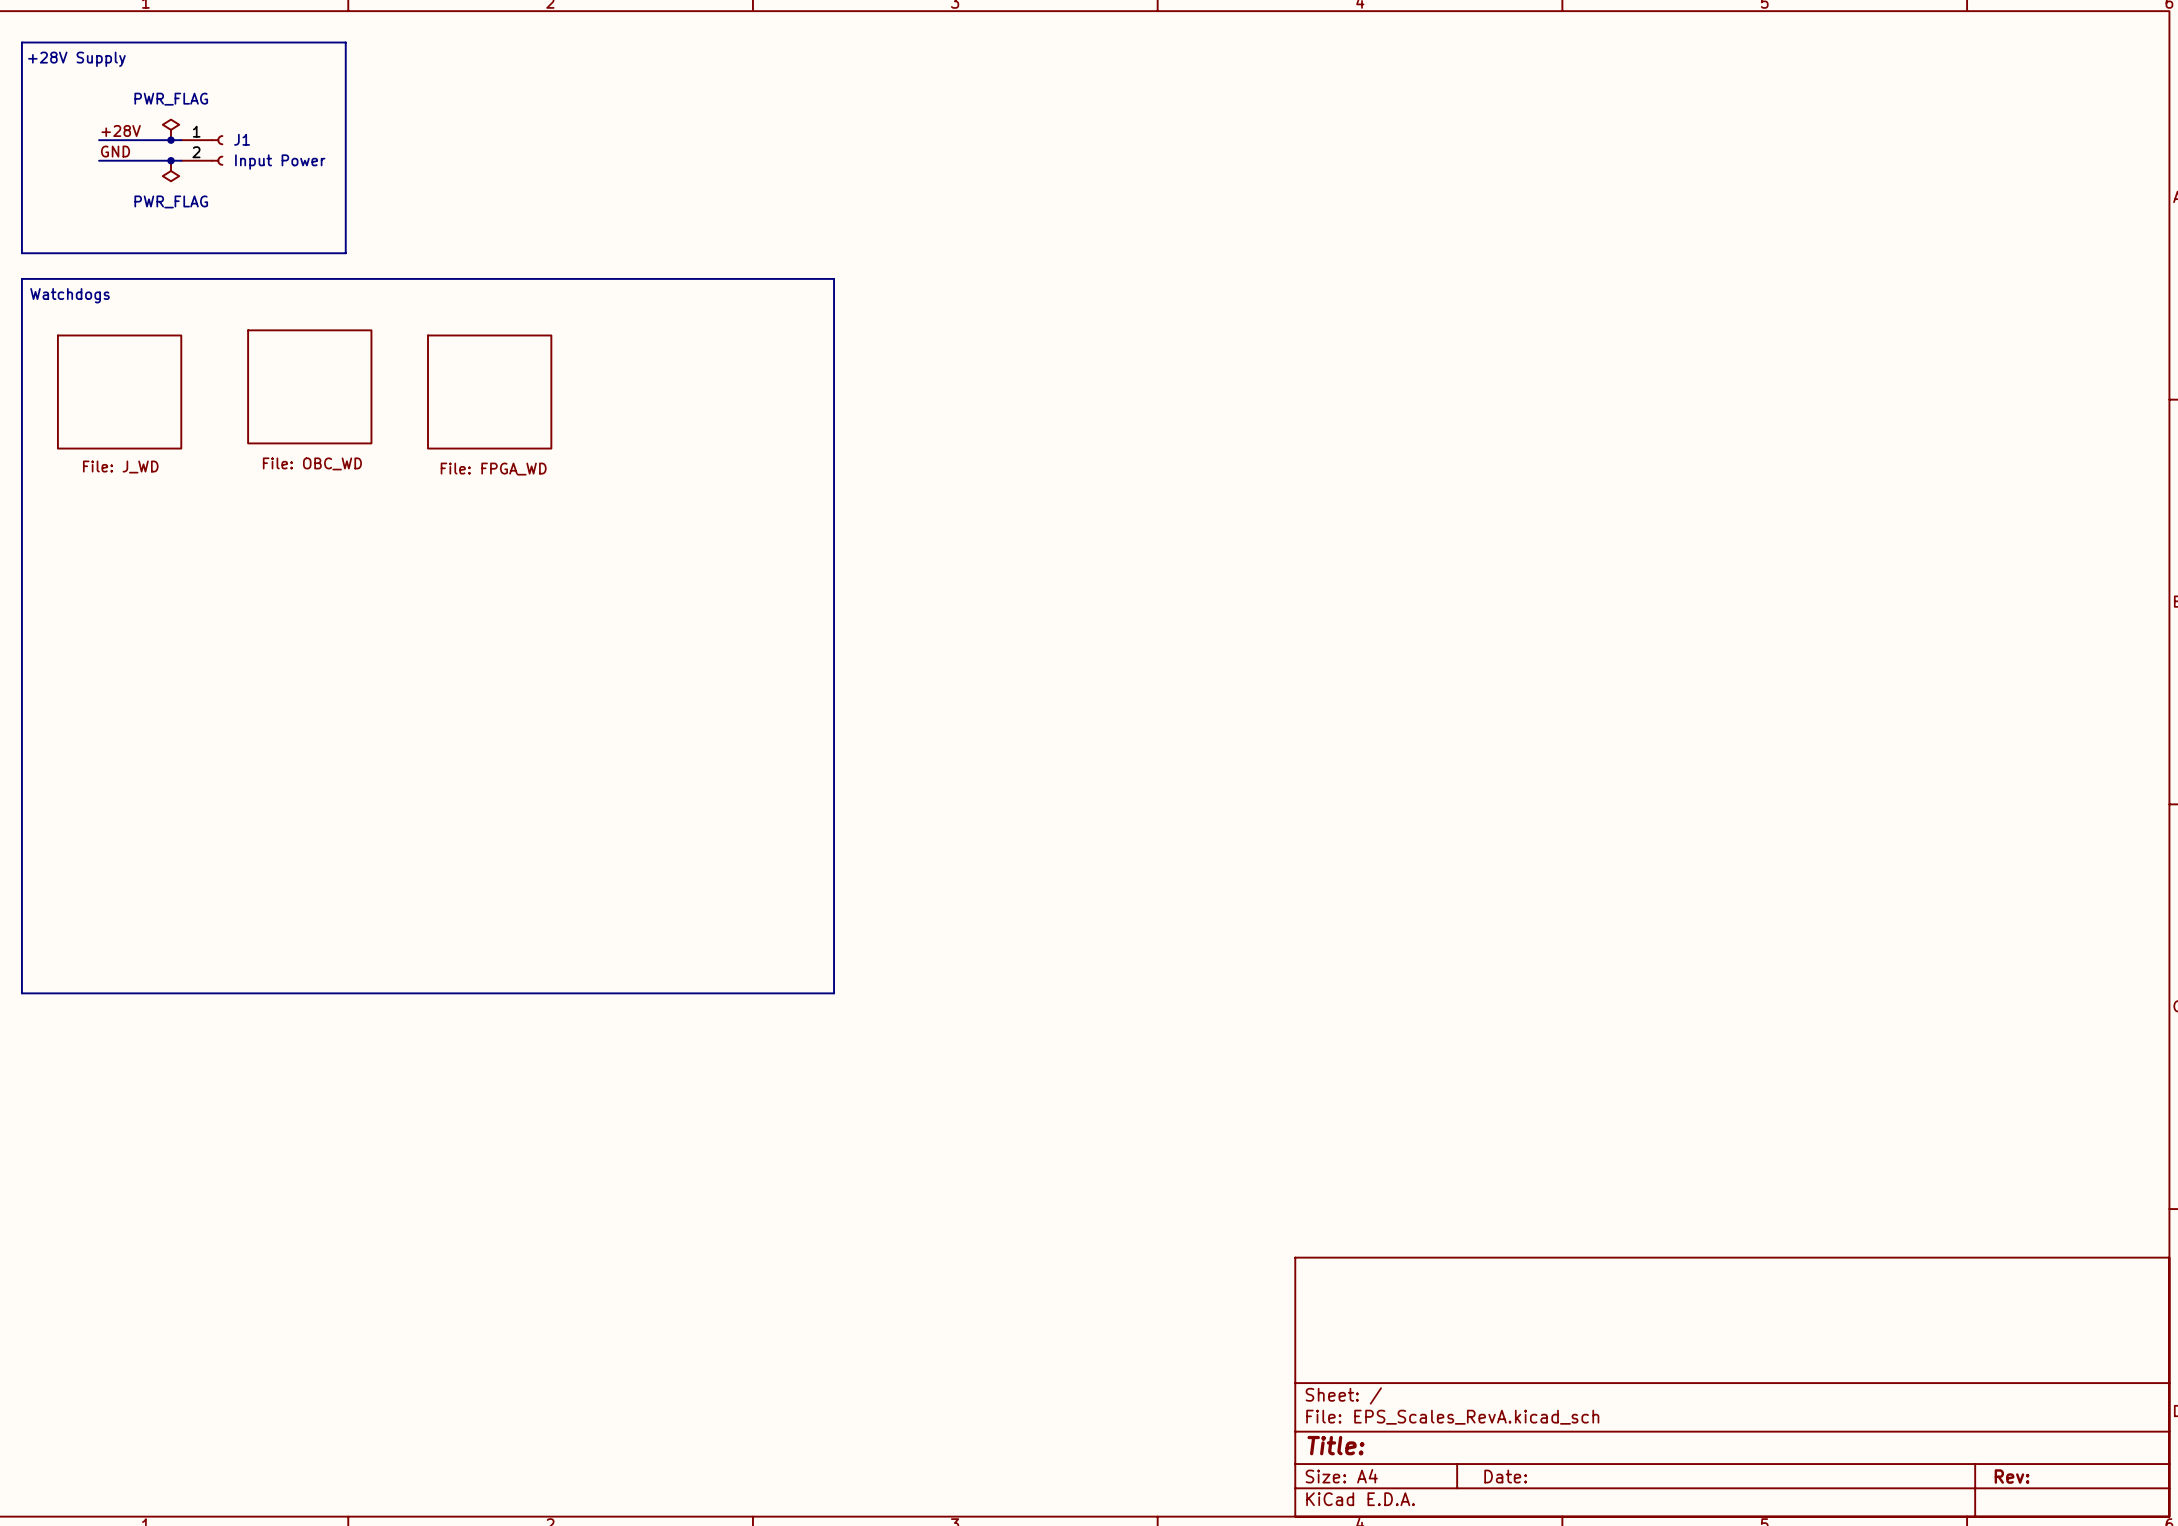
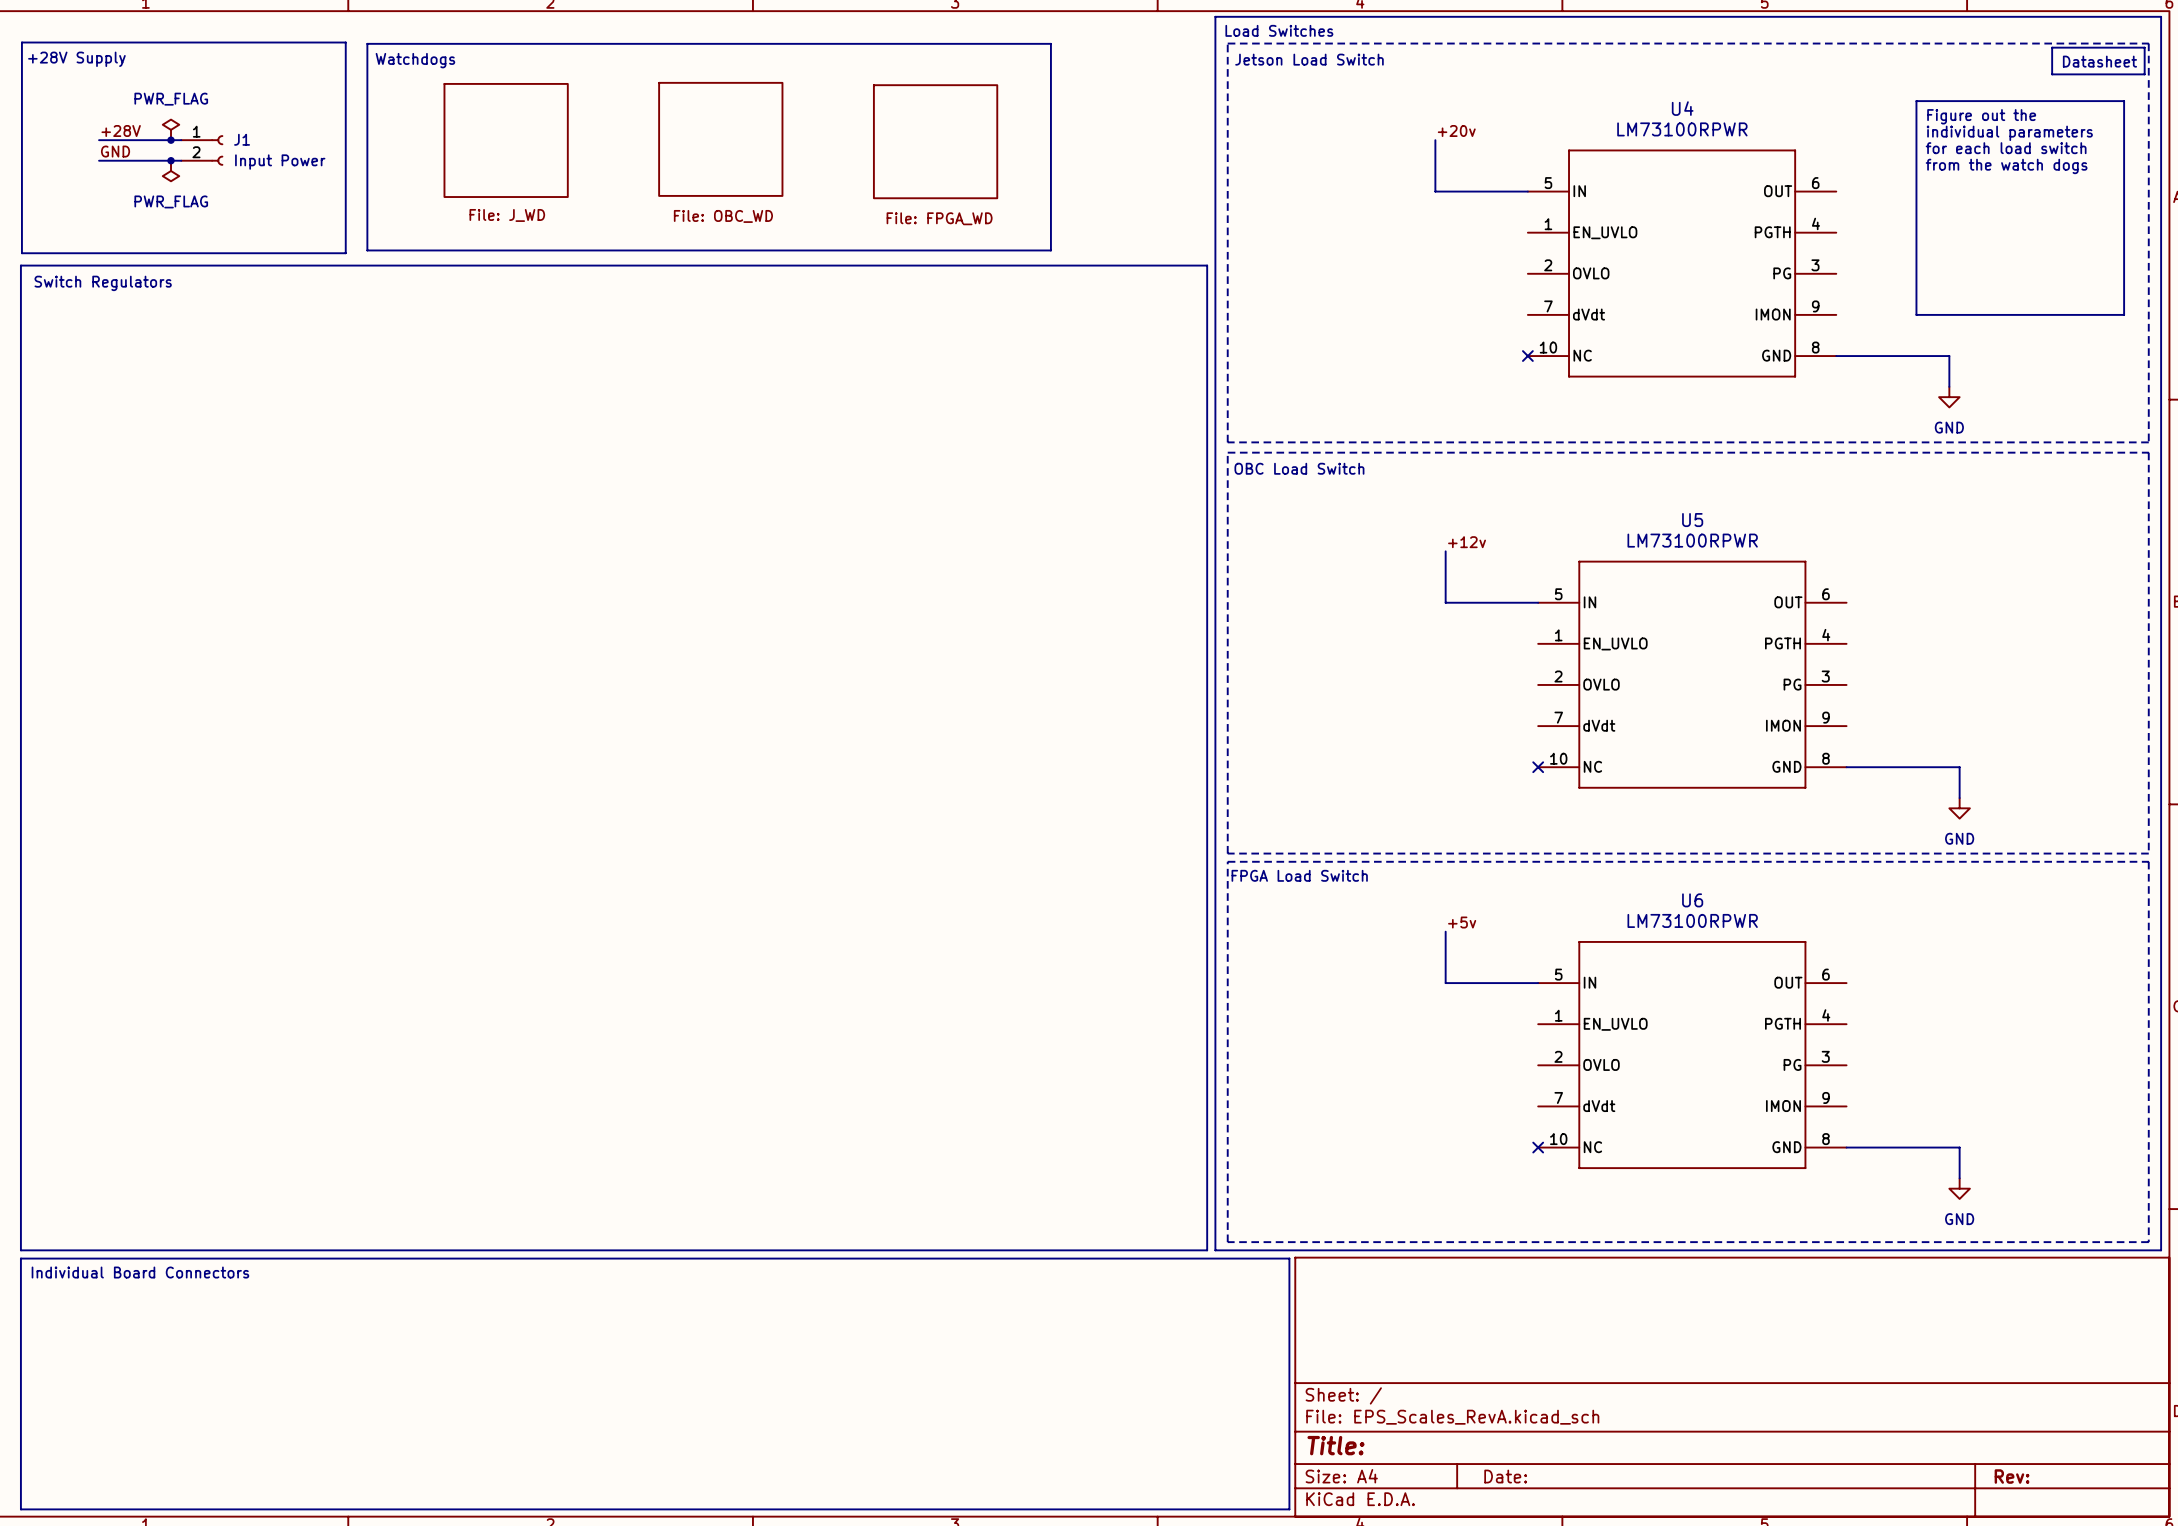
line: none -> (1215, 16) (2161, 16) (2161, 1250) (1215, 1250) (1215, 16)
text: none -> Load Switches (1279, 30)
line: none -> (367, 43) (1050, 43) (1050, 250) (367, 250) (367, 43)
line: none -> (1227, 43) (1227, 442) (2148, 442) (2148, 43) (1227, 43)
line: none -> (2052, 47) (2144, 47) (2144, 74) (2052, 74) (2052, 47)
text: none -> Jetson Load Switch (1309, 59)
text: none -> Watchdogs (415, 60)
text: none -> Datasheet (2099, 61)
line: none -> (1916, 101) (2124, 101) (2124, 314) (1916, 314) (1916, 101)
text: none -> Figure out the (1981, 116)
label: none -> +20v (1456, 130)
text: none -> individual parameters (2009, 133)
sheet: none -> File: OBC_WD (720, 139)
sheet: none -> File: J_WD (506, 140)
wire: none -> (1435, 140) (1435, 191) (1527, 191)
sheet: none -> File: FPGA_WD (935, 141)
text: none -> for each load switch (2006, 148)
text: none -> from the watch dogs (2006, 166)
U4: none -> LM73100RPWR (1682, 263)
line: none -> (20, 265) (1207, 265) (1207, 1250) (20, 1250) (20, 265)
line: (21, 278) (21, 993) (834, 993) (834, 278) (21, 278) -> none
text: none -> Switch Regulators (103, 283)
text: Watchdogs (70, 295) -> none
no-connect mark: none -> (1527, 356)
wire: none -> (1836, 356) (1949, 356) (1949, 386)
sheet: File: OBC_WD (309, 386) -> none
sheet: File: J_WD (119, 392) -> none
sheet: File: FPGA_WD (489, 392) -> none
power symbol: none -> GND (1949, 397)
line: none -> (1227, 452) (2148, 452) (2148, 853) (1227, 853) (1227, 452)
text: none -> OBC Load Switch (1299, 468)
label: none -> +12v (1467, 542)
wire: none -> (1445, 551) (1445, 602) (1538, 602)
U5: none -> LM73100RPWR (1692, 674)
no-connect mark: none -> (1538, 767)
wire: none -> (1846, 767) (1959, 767) (1959, 798)
power symbol: none -> GND (1959, 808)
line: none -> (1227, 861) (1227, 1242) (2148, 1242) (2148, 861) (1227, 861)
text: none -> FPGA Load Switch (1299, 875)
label: none -> +5v (1462, 922)
wire: none -> (1445, 931) (1445, 983) (1538, 983)
U6: none -> LM73100RPWR (1692, 1055)
no-connect mark: none -> (1538, 1147)
wire: none -> (1846, 1147) (1959, 1147) (1959, 1178)
power symbol: none -> GND (1959, 1188)
line: none -> (20, 1258) (20, 1509) (1289, 1509) (1289, 1258) (20, 1258)
text: none -> Individual Board Connectors (140, 1272)

